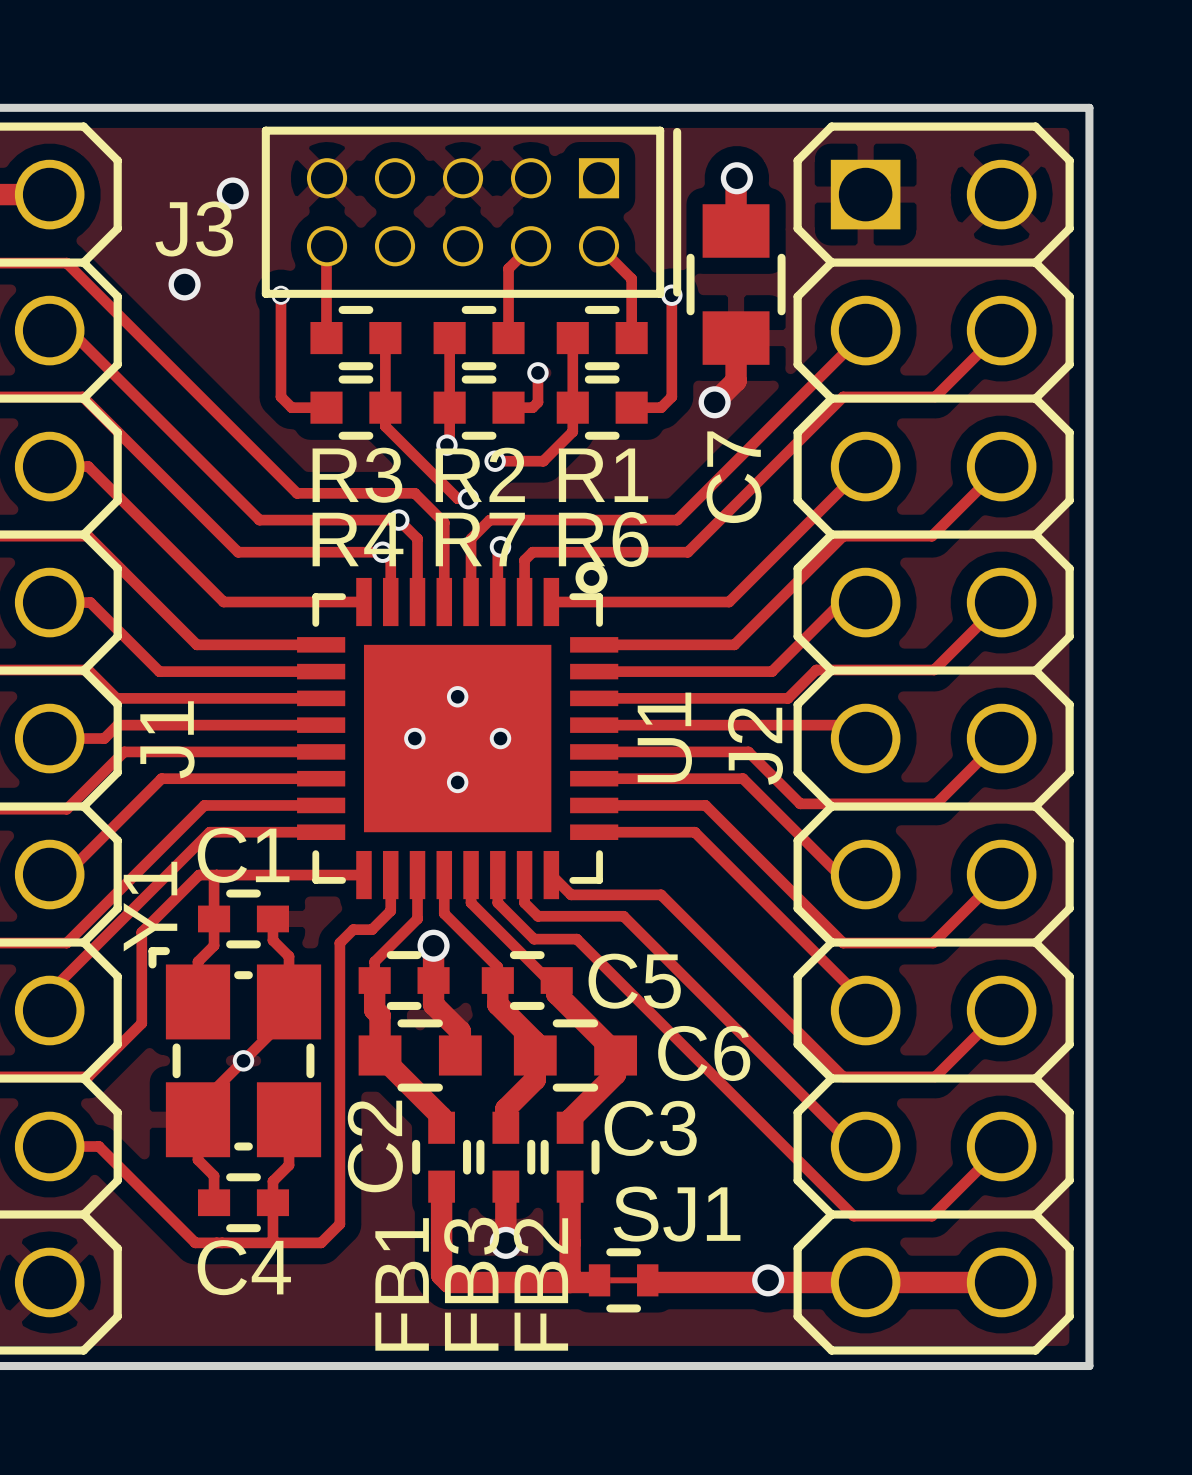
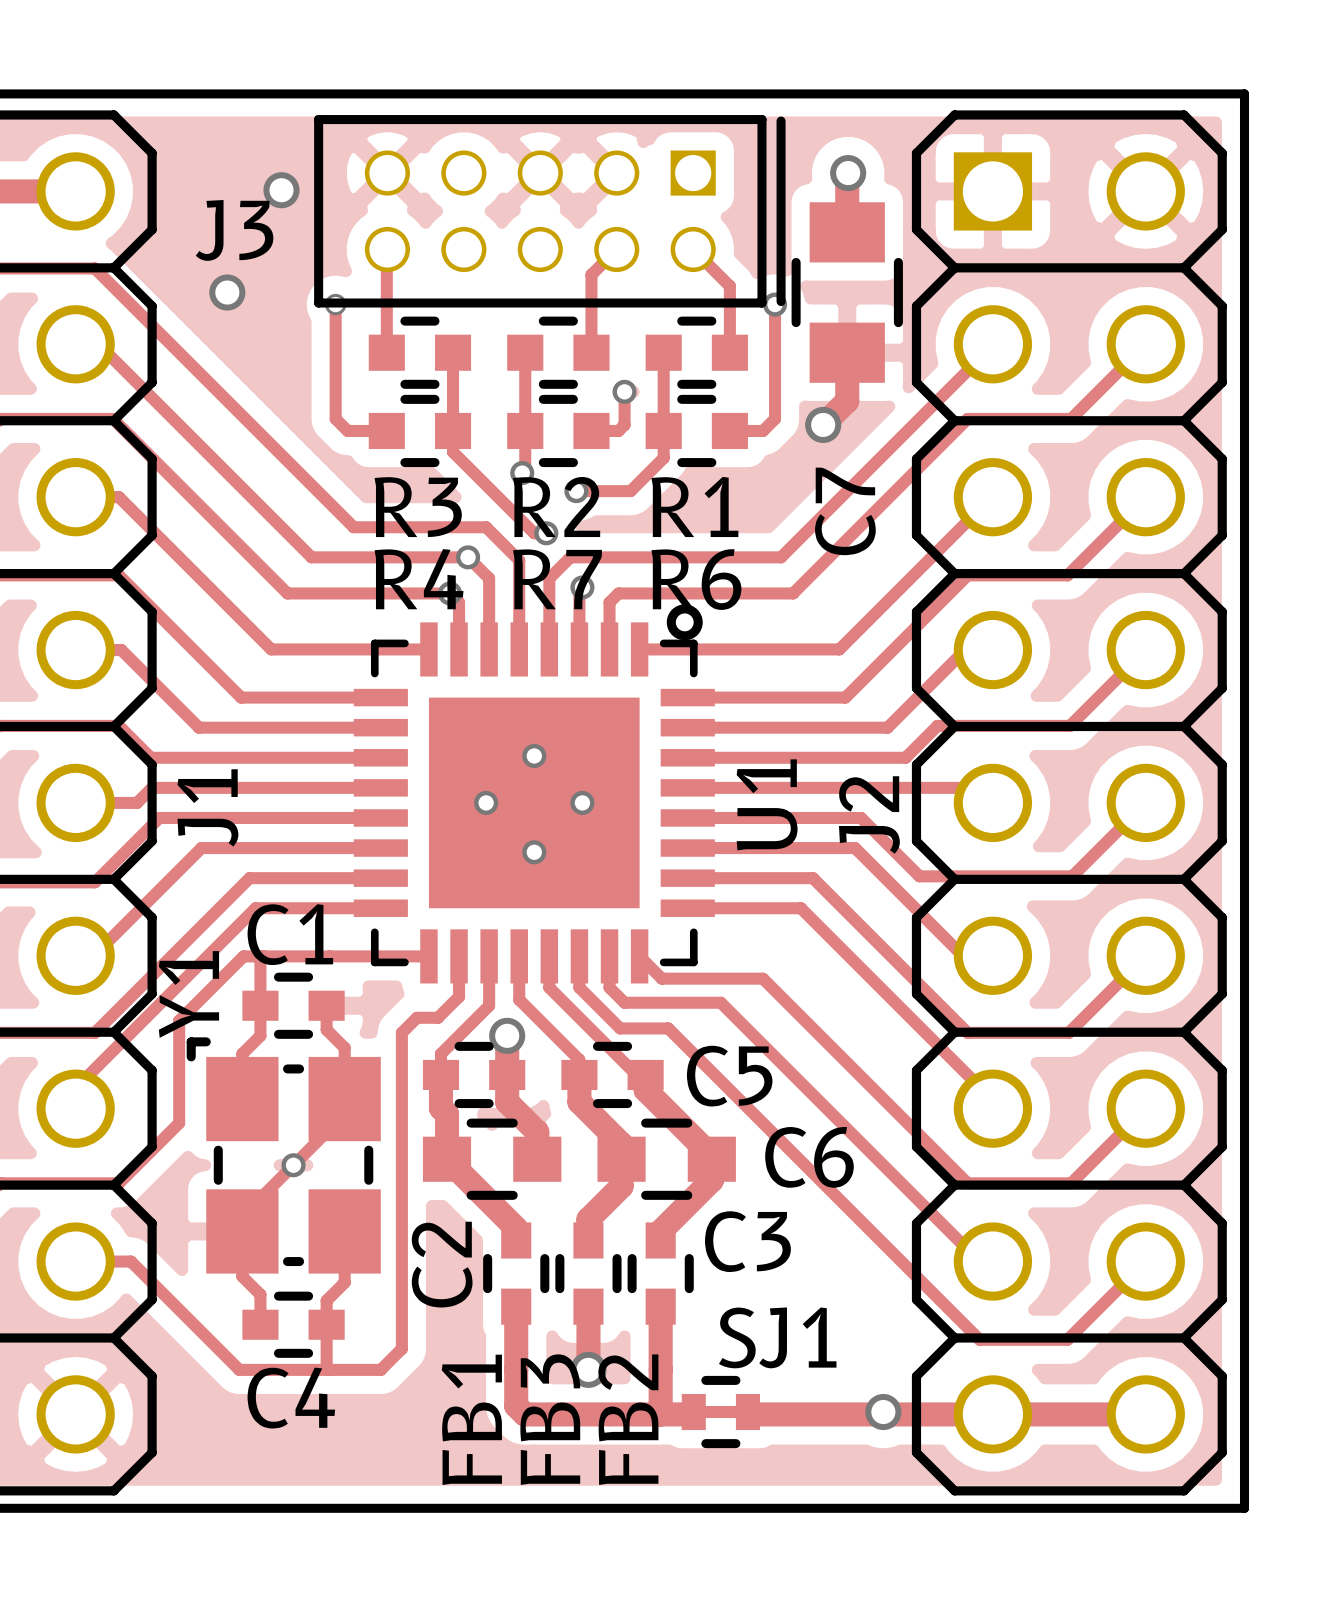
SJ1 footprint: [588, 1248, 659, 1313] -> [681, 1375, 760, 1449]

